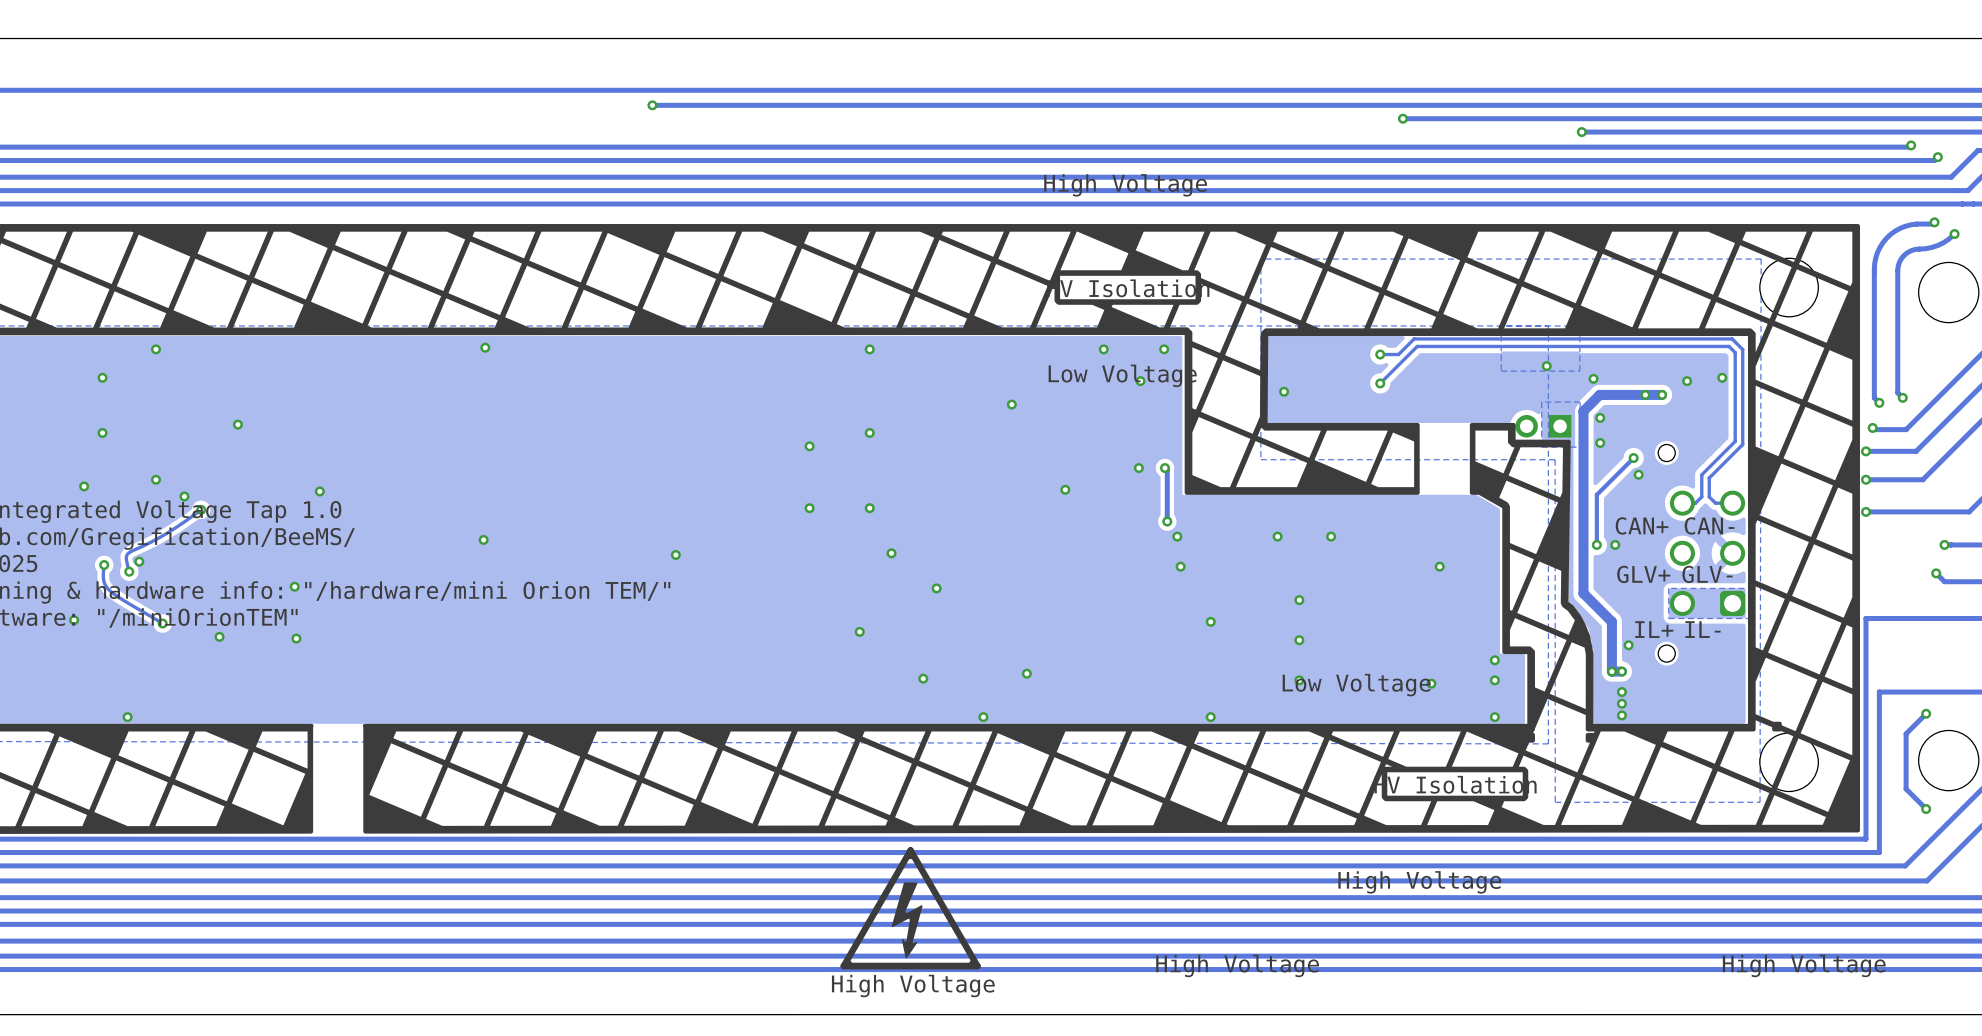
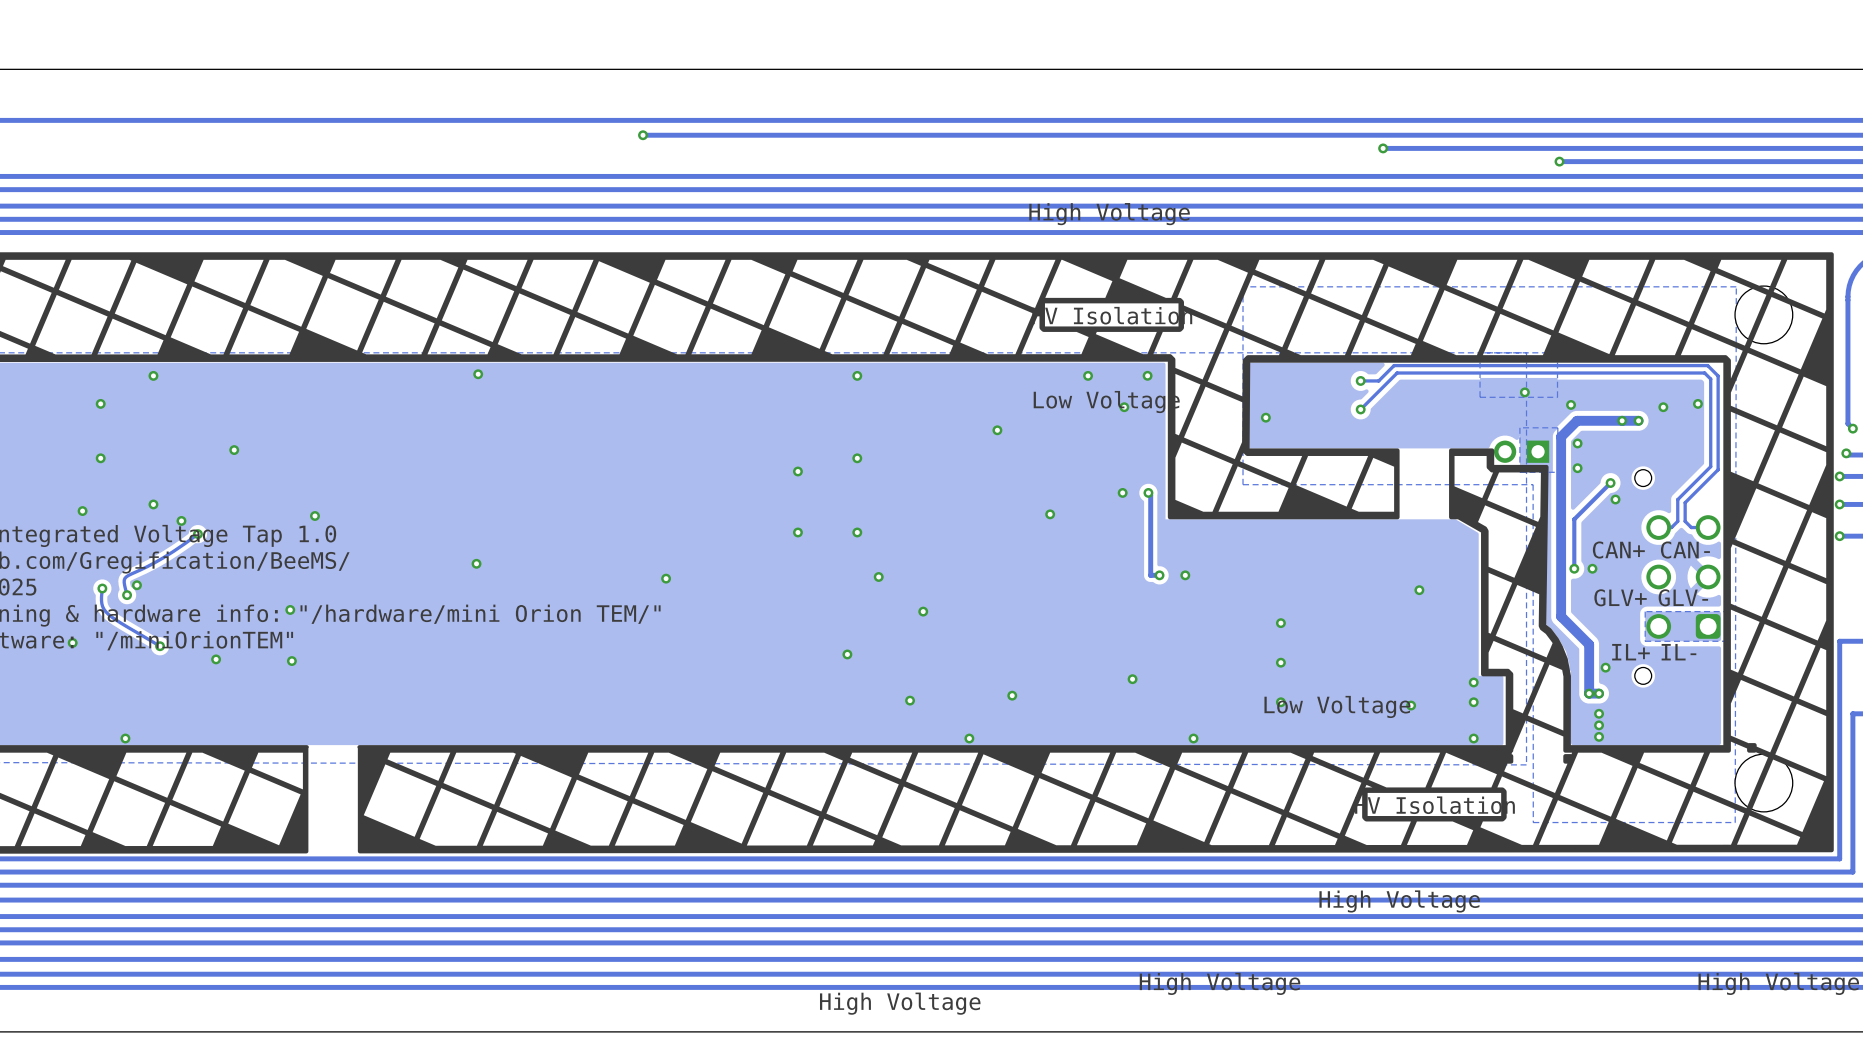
track: none -> (1150, 545) (1150, 575) (1159, 575)
via: (1167, 521) -> none
via: (1177, 536) -> none
via: (1277, 536) -> none
via: (1331, 536) -> none
via: none -> (1159, 575)
via: none -> (1185, 575)
via: (1180, 566) -> none
via: (1210, 621) -> none
via: none -> (1132, 679)
drawing: [840, 847, 981, 970] -> none

